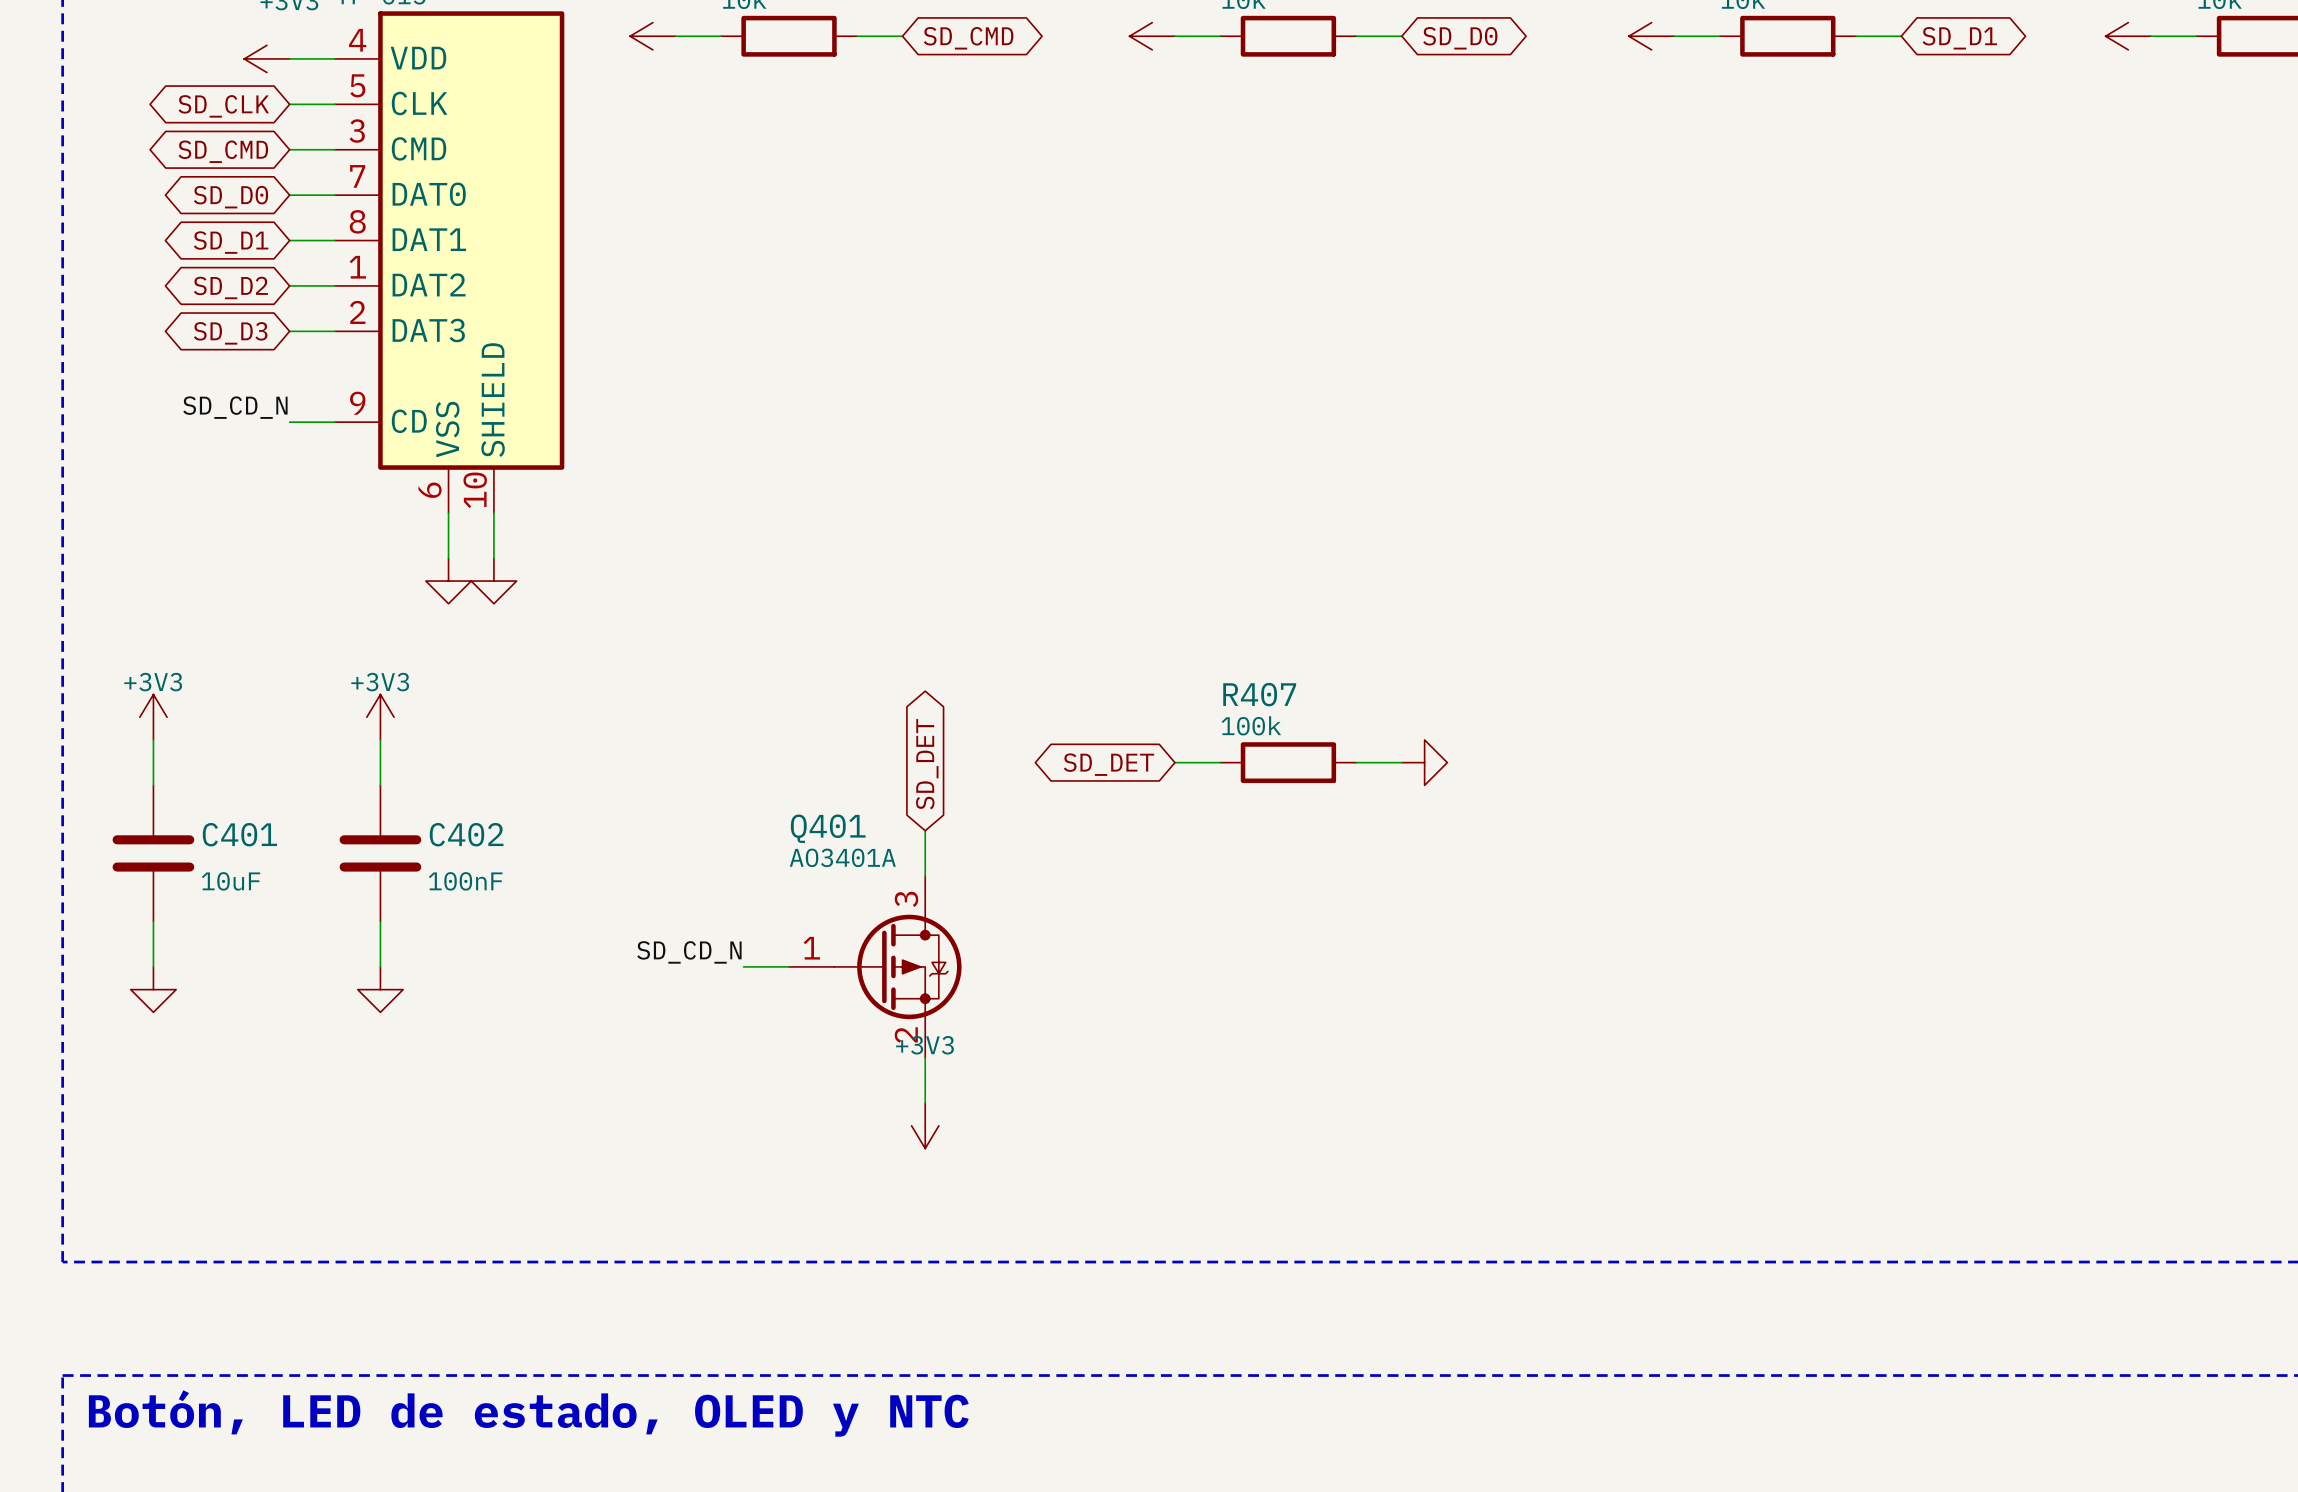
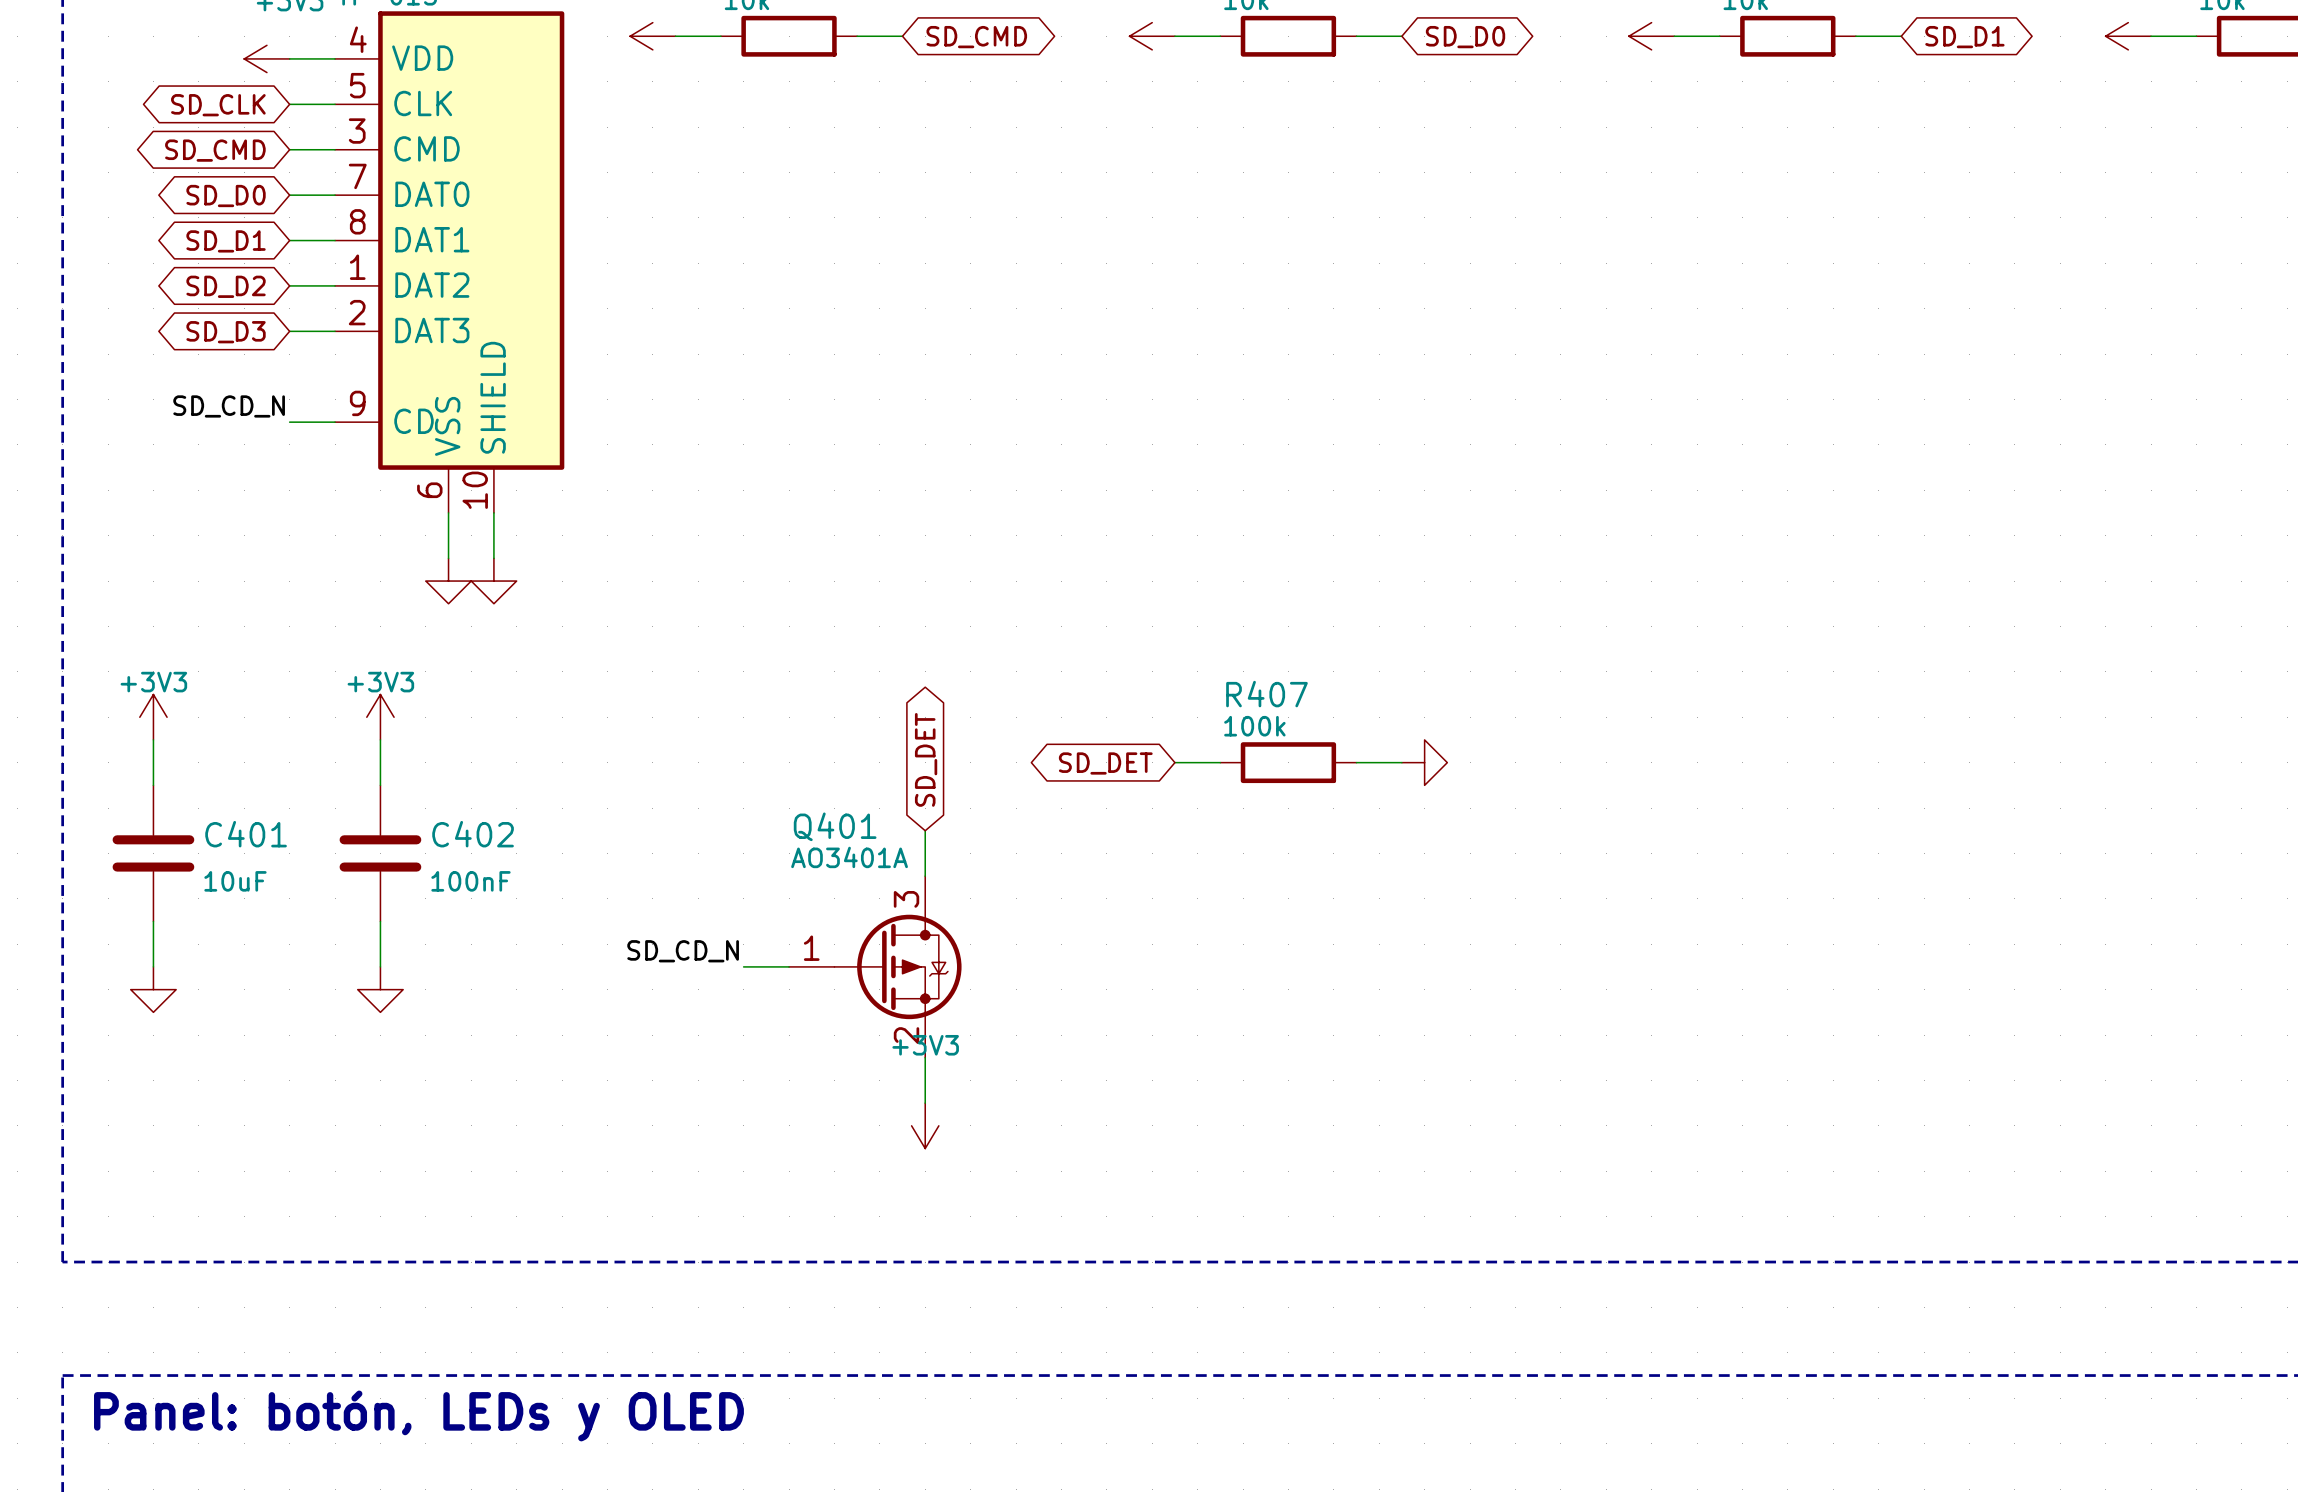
text: Botón, LED de estado, OLED y NTC (528, 1413) -> Panel: botón, LEDs y OLED (418, 1415)

